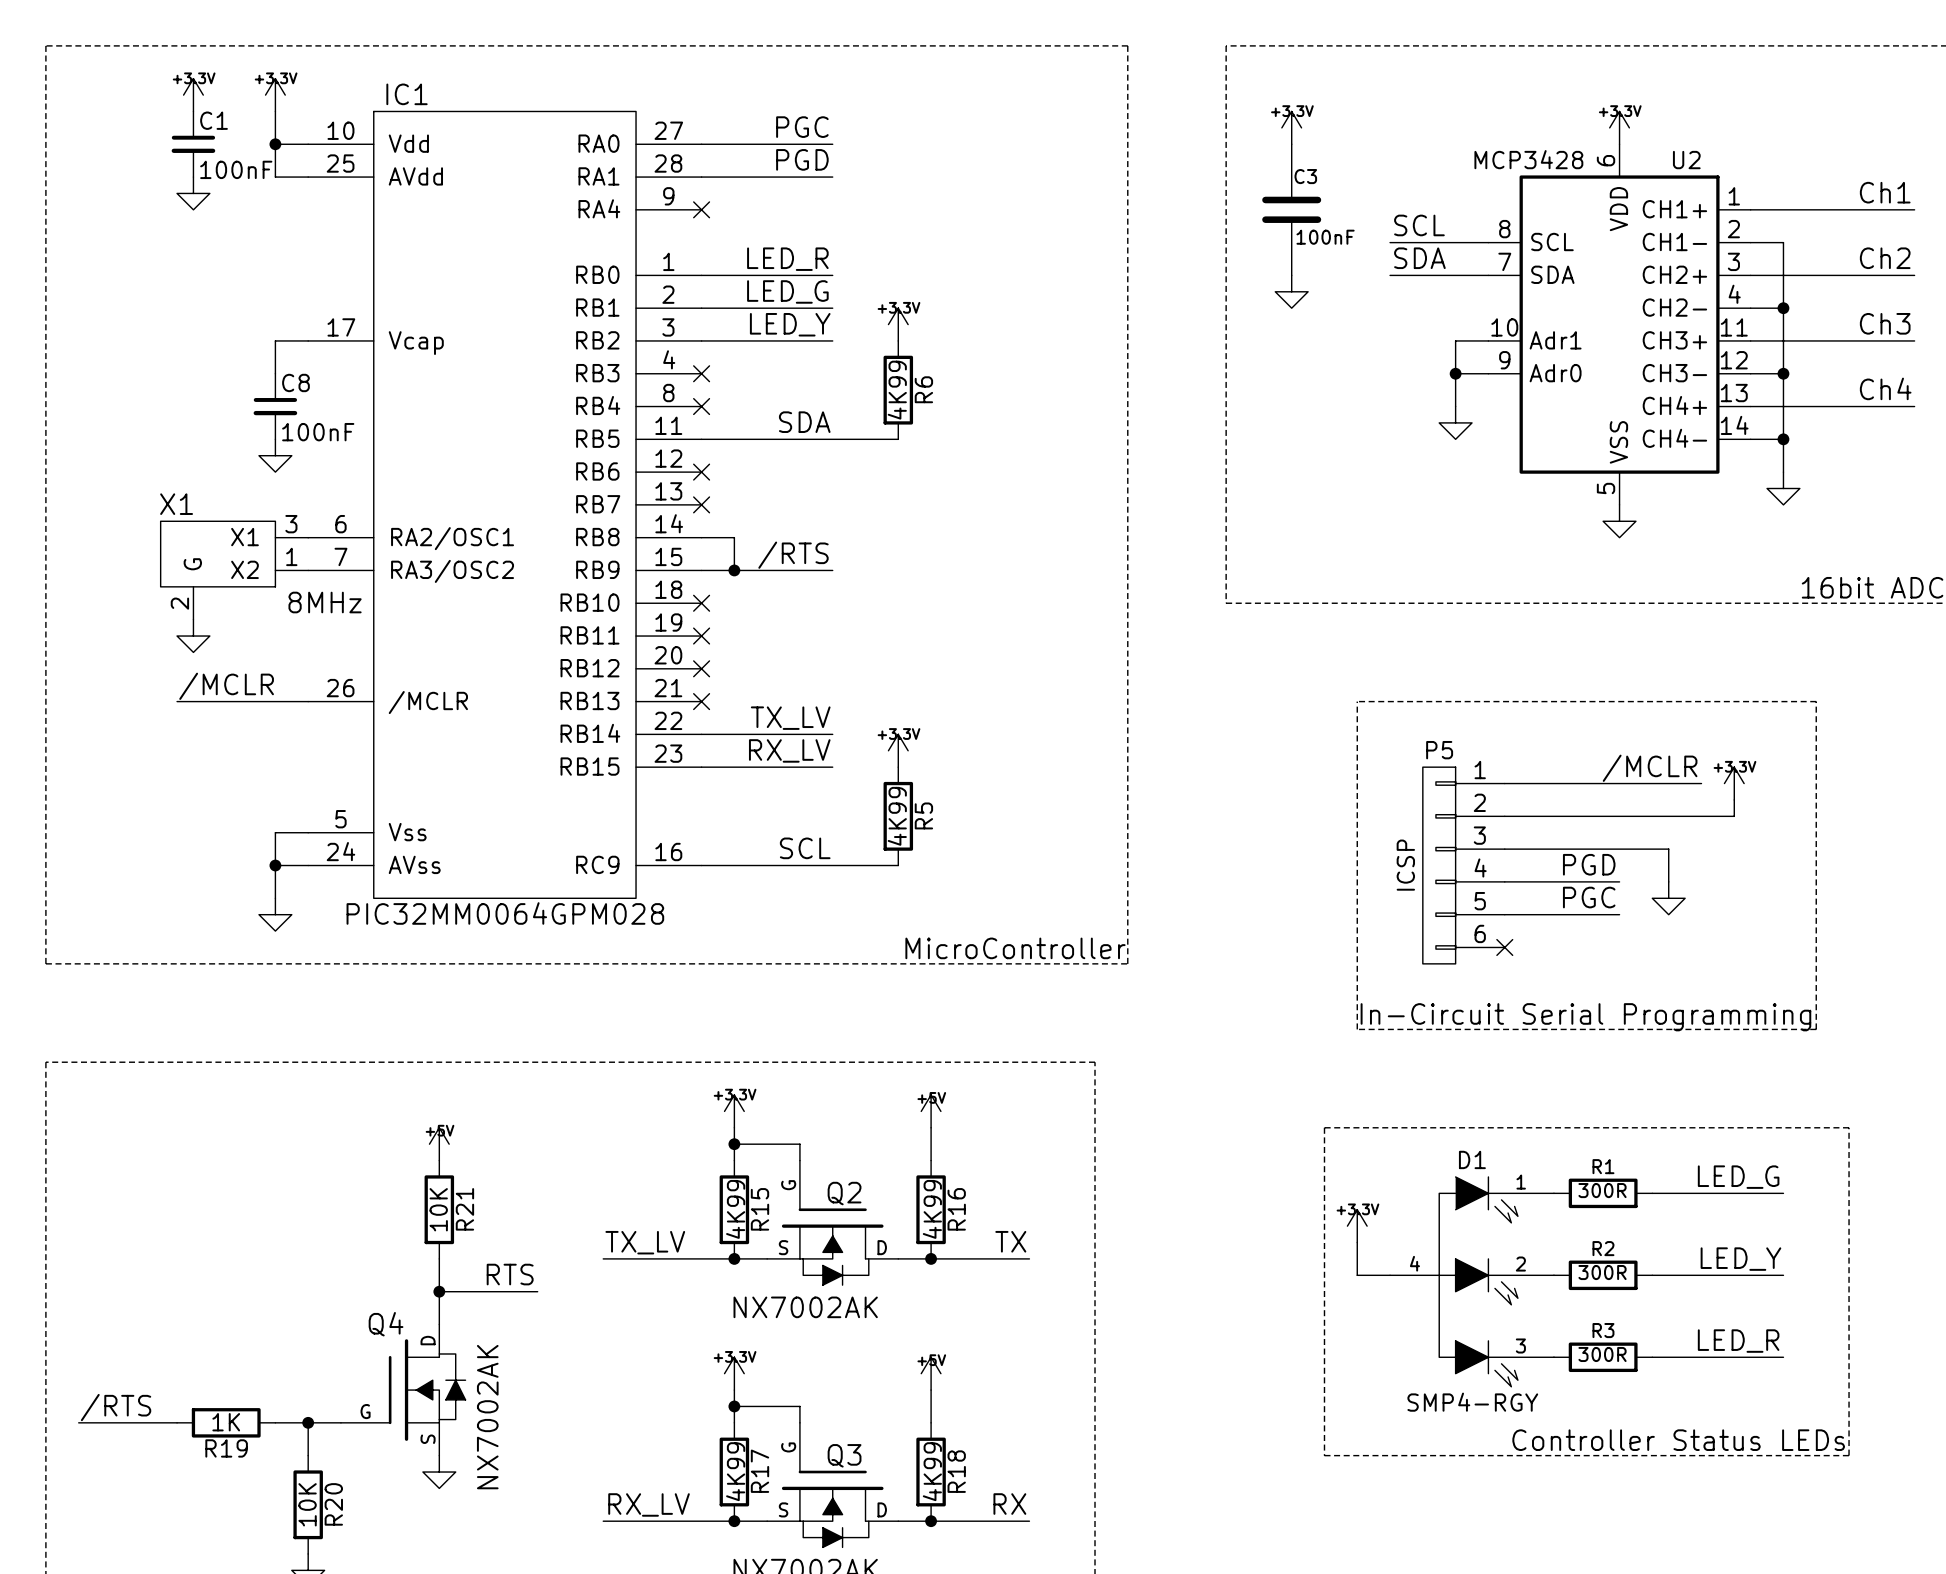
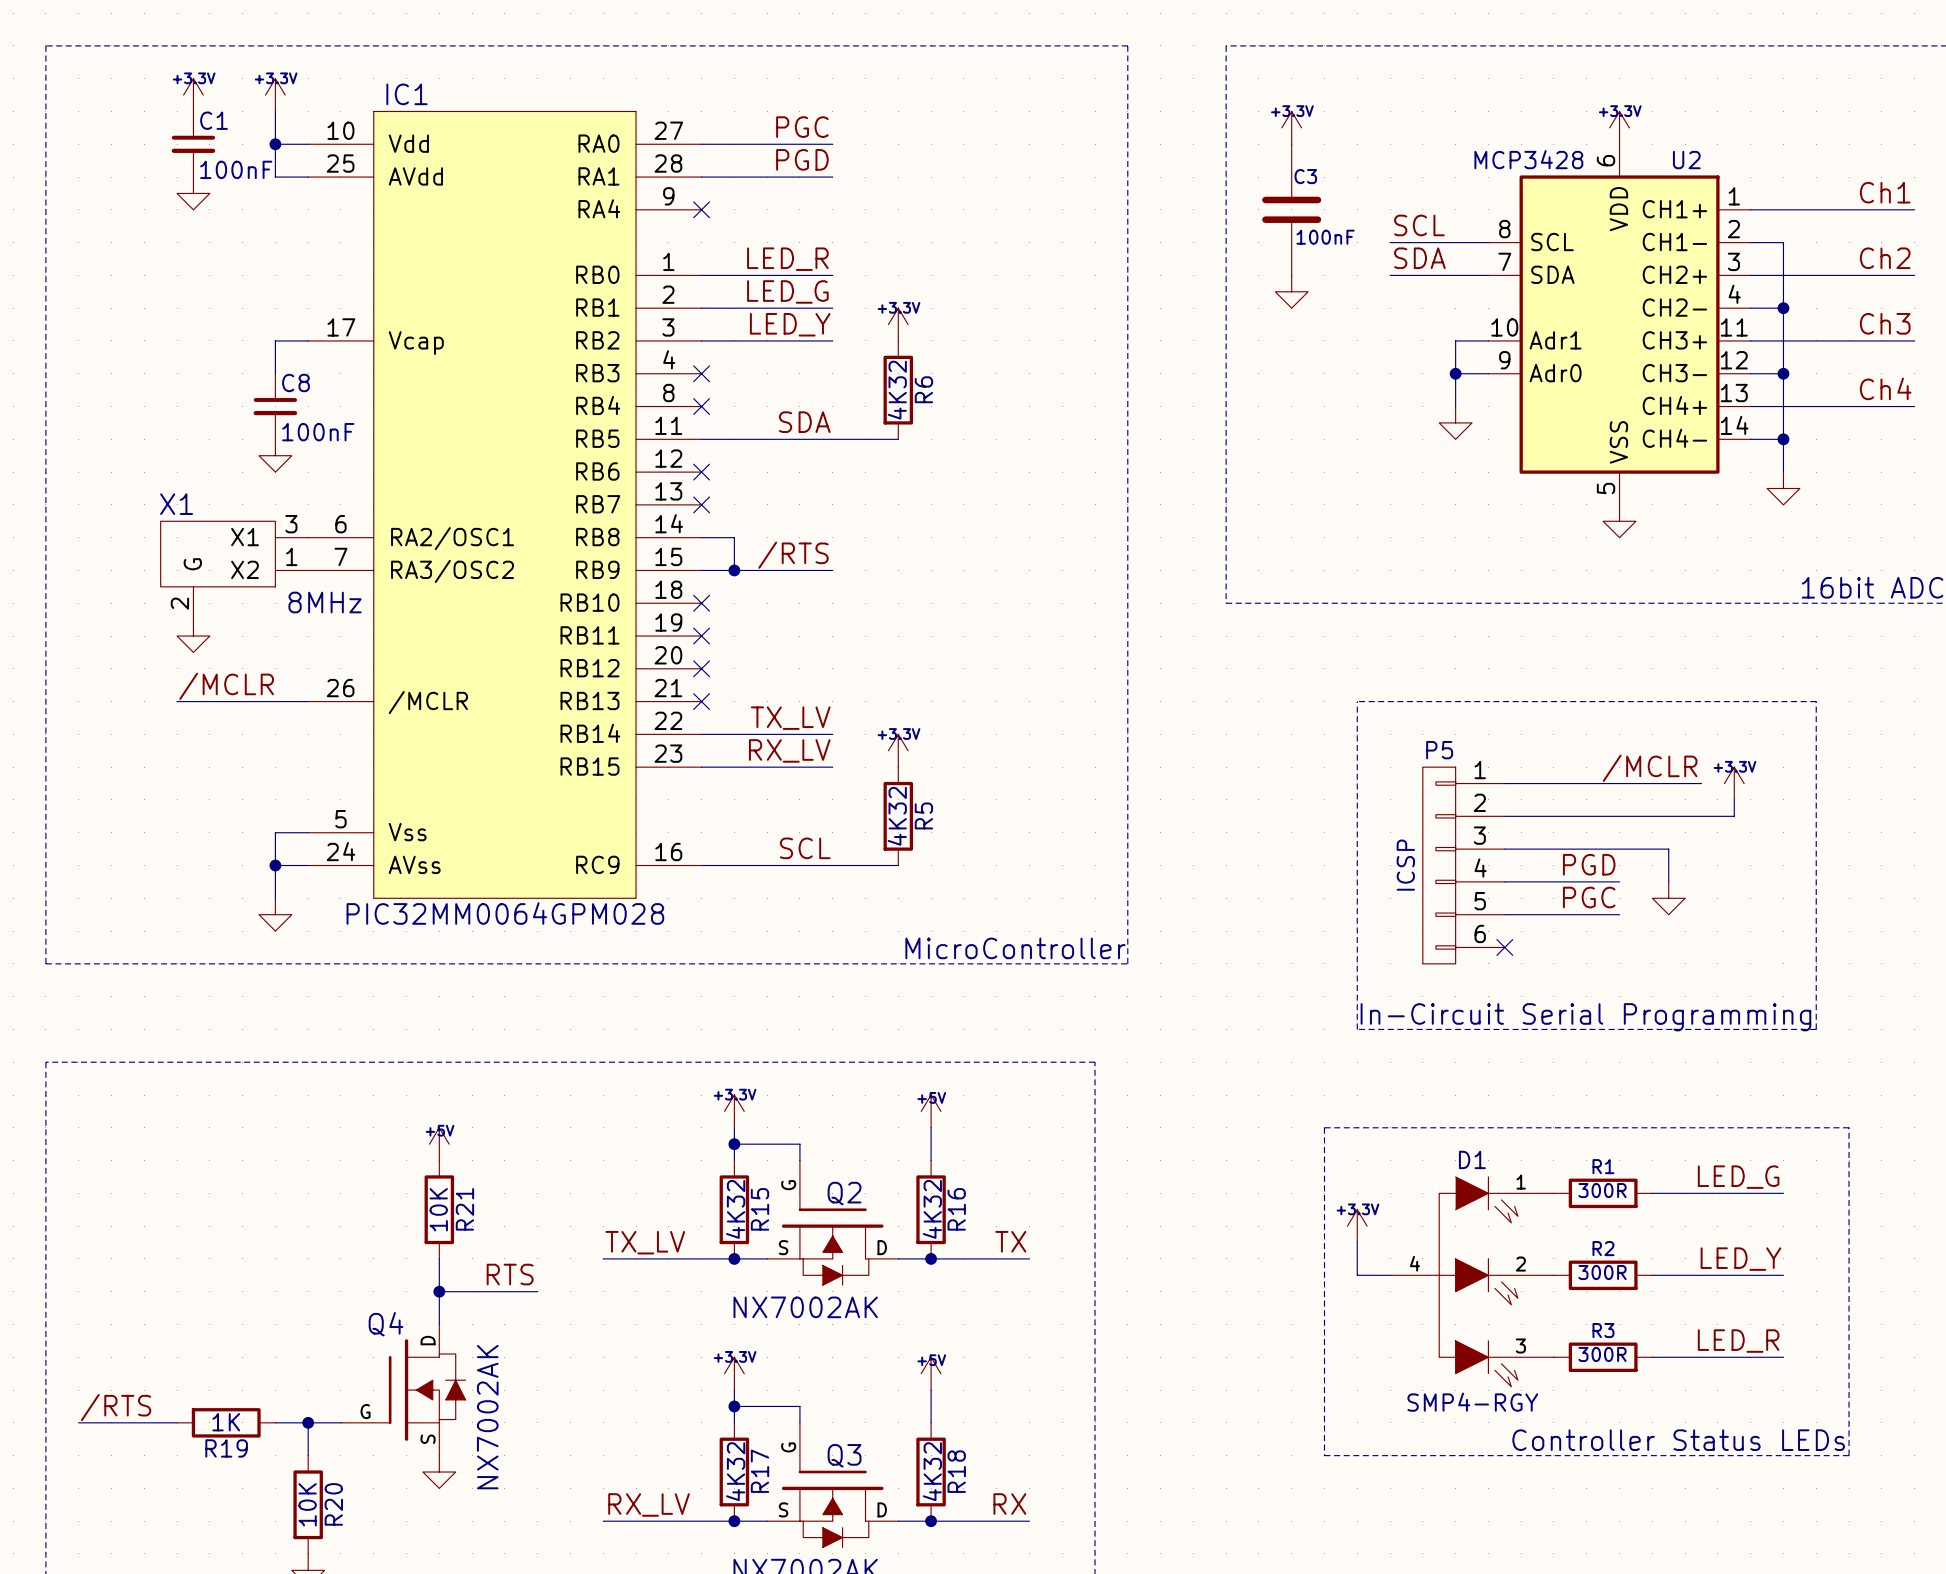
R6 value: 4K99 (897, 390) -> 4K32 (897, 390)
R5 value: 4K99 (897, 816) -> 4K32 (897, 816)
R15 value: 4K99 (735, 1209) -> 4K32 (735, 1209)
R16 value: 4K99 (932, 1209) -> 4K32 (932, 1209)
R17 value: 4K99 (735, 1471) -> 4K32 (735, 1471)
R18 value: 4K99 (932, 1471) -> 4K32 (932, 1471)

